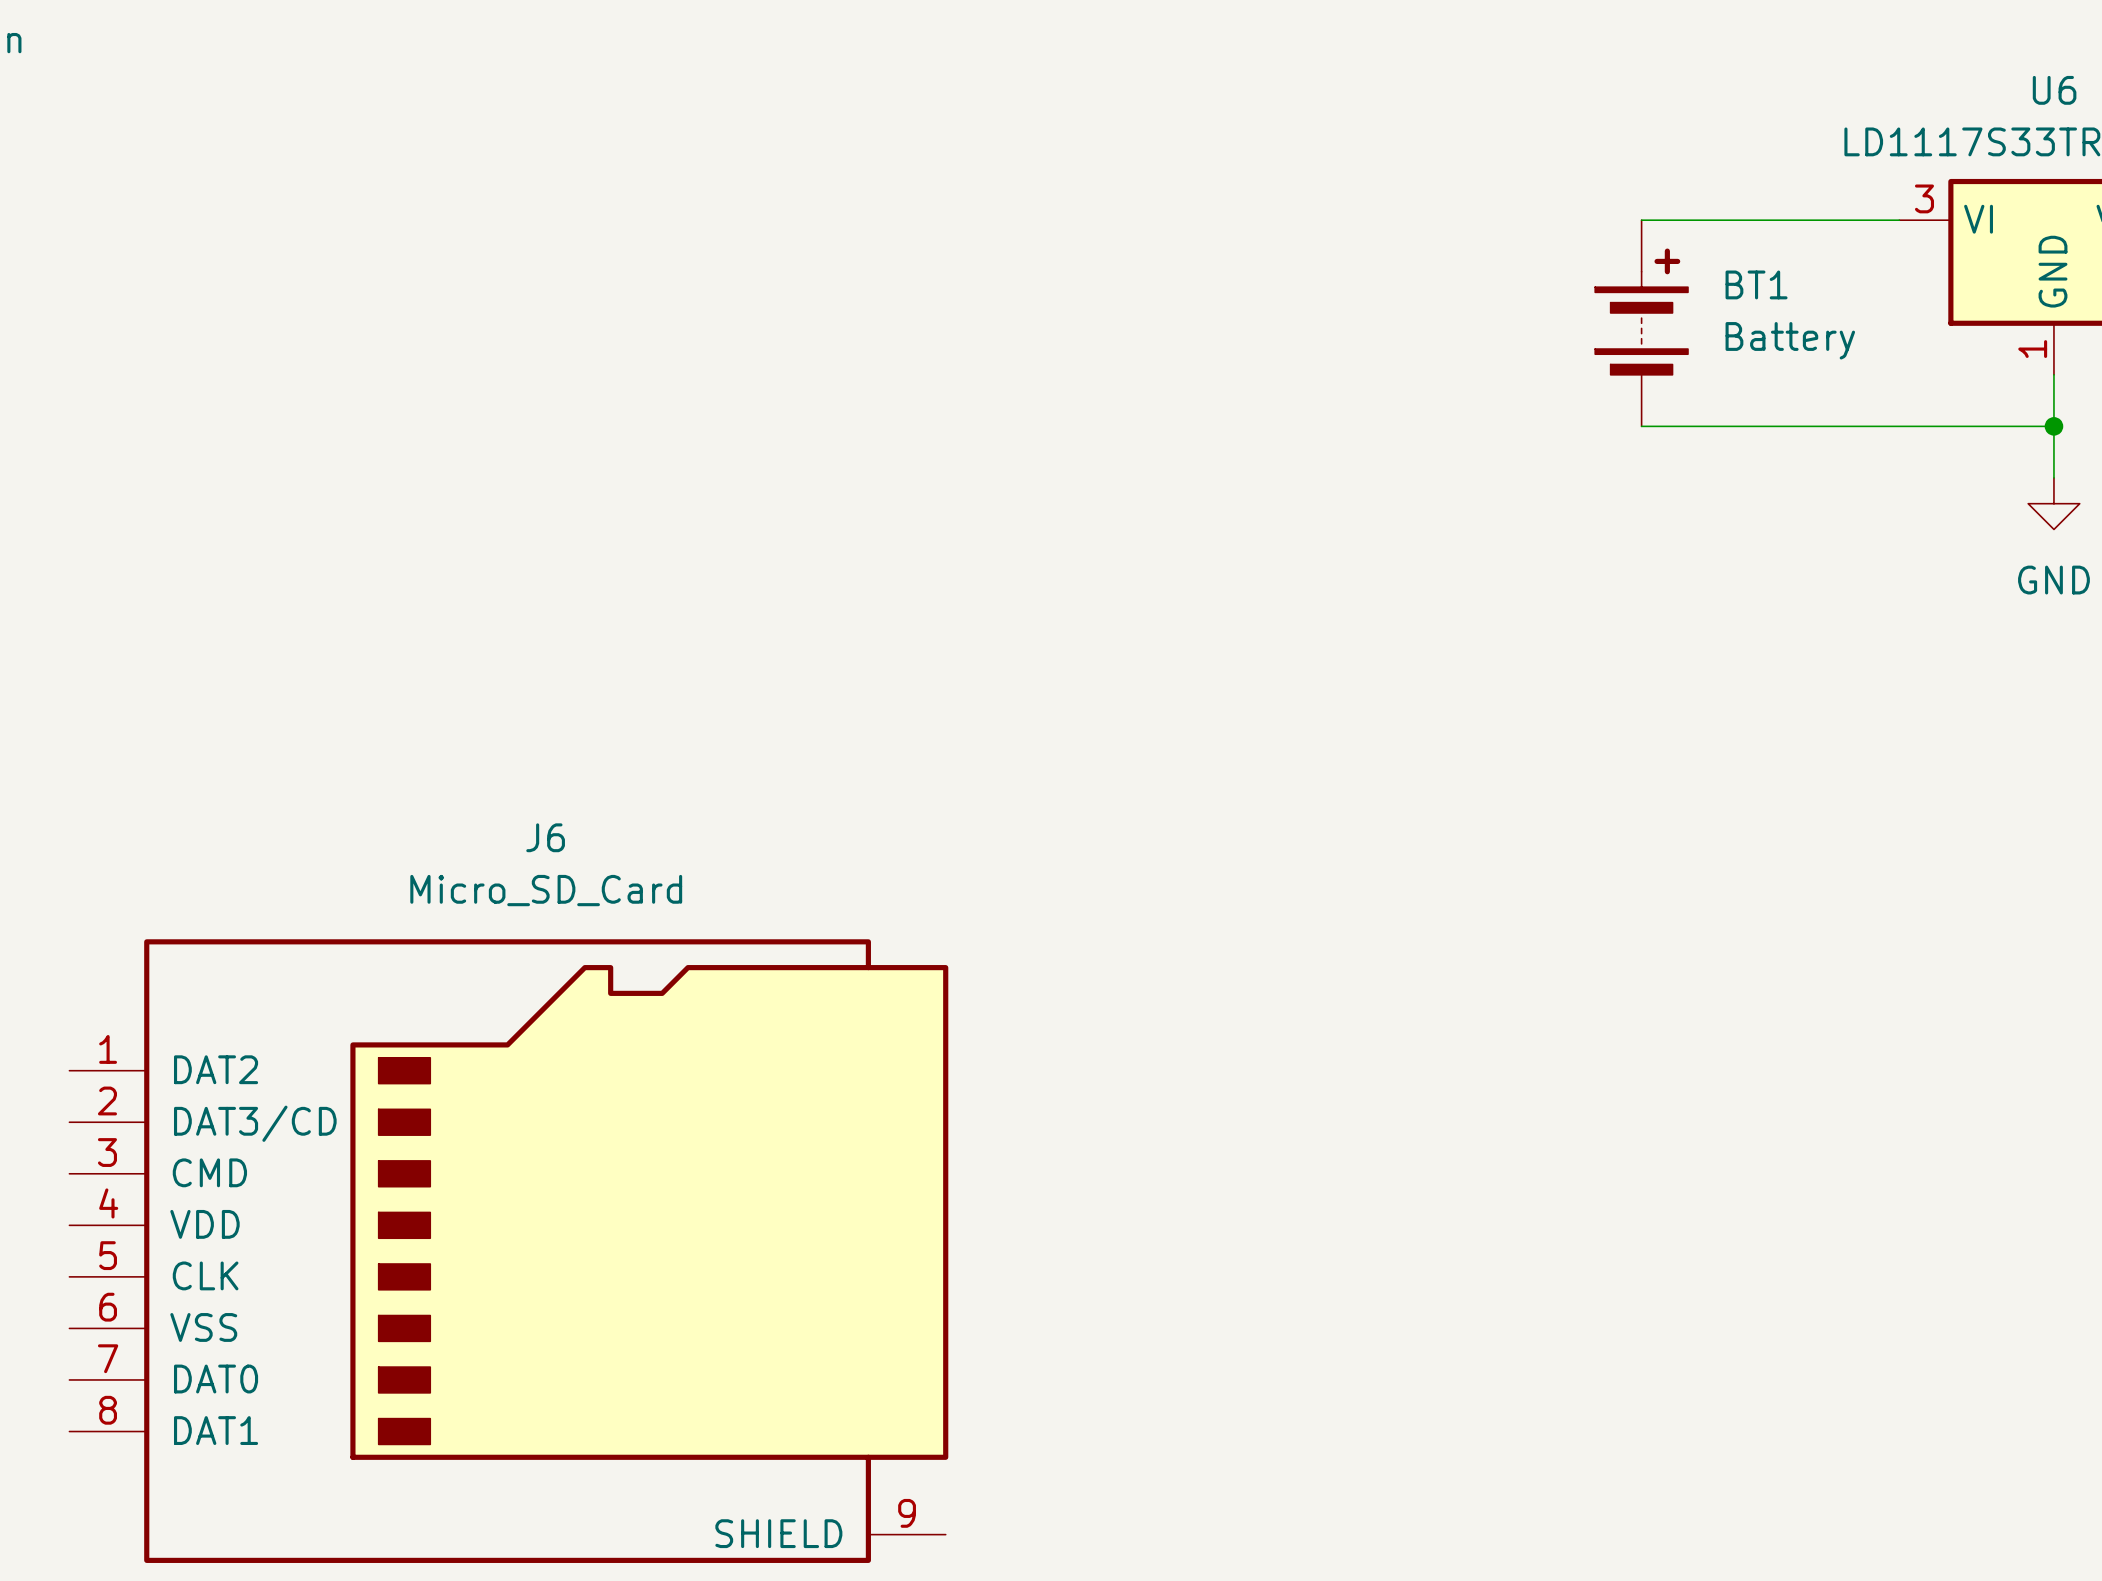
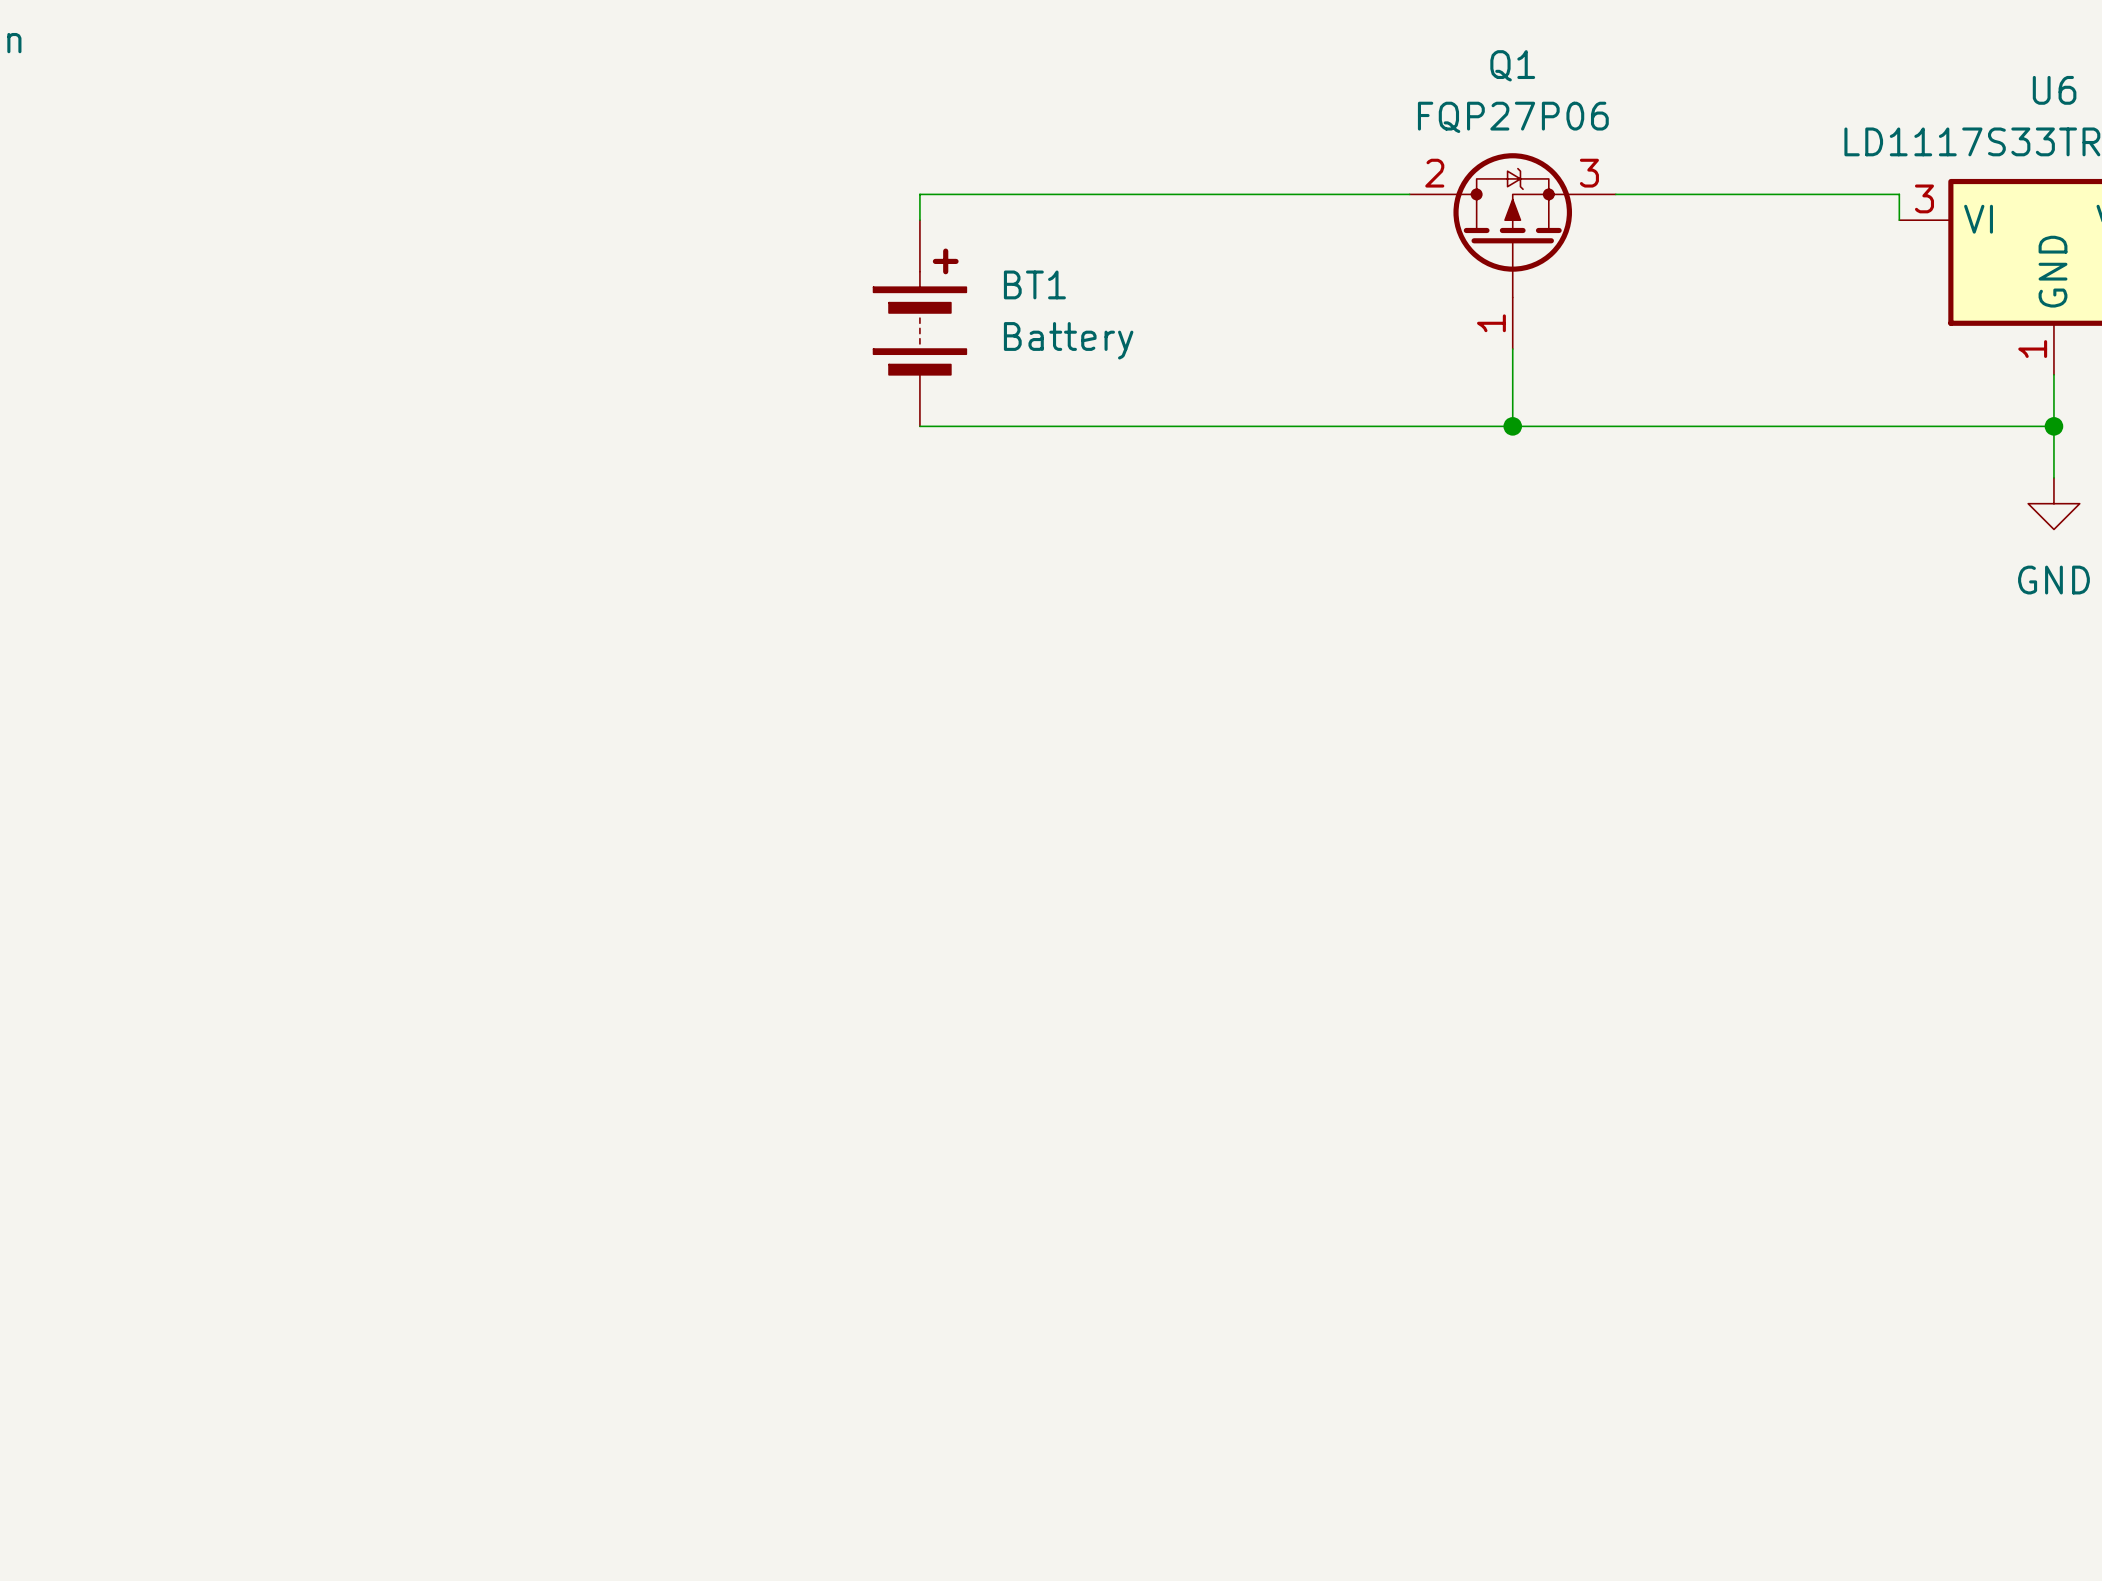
wire: none -> (1409, 194) (919, 194) (919, 220)
wire: (1641, 220) (1899, 220) -> (1615, 194) (1899, 194) (1899, 220)
Q1: none -> FQP27P06 (1512, 251)
BT1 position: (1641, 323) -> (919, 323)
wire: none -> (1512, 349) (1512, 426)
wire: none -> (919, 426) (1641, 426)
junction: none -> (1512, 426)
J6: Micro_SD_Card (508, 1251) -> none

